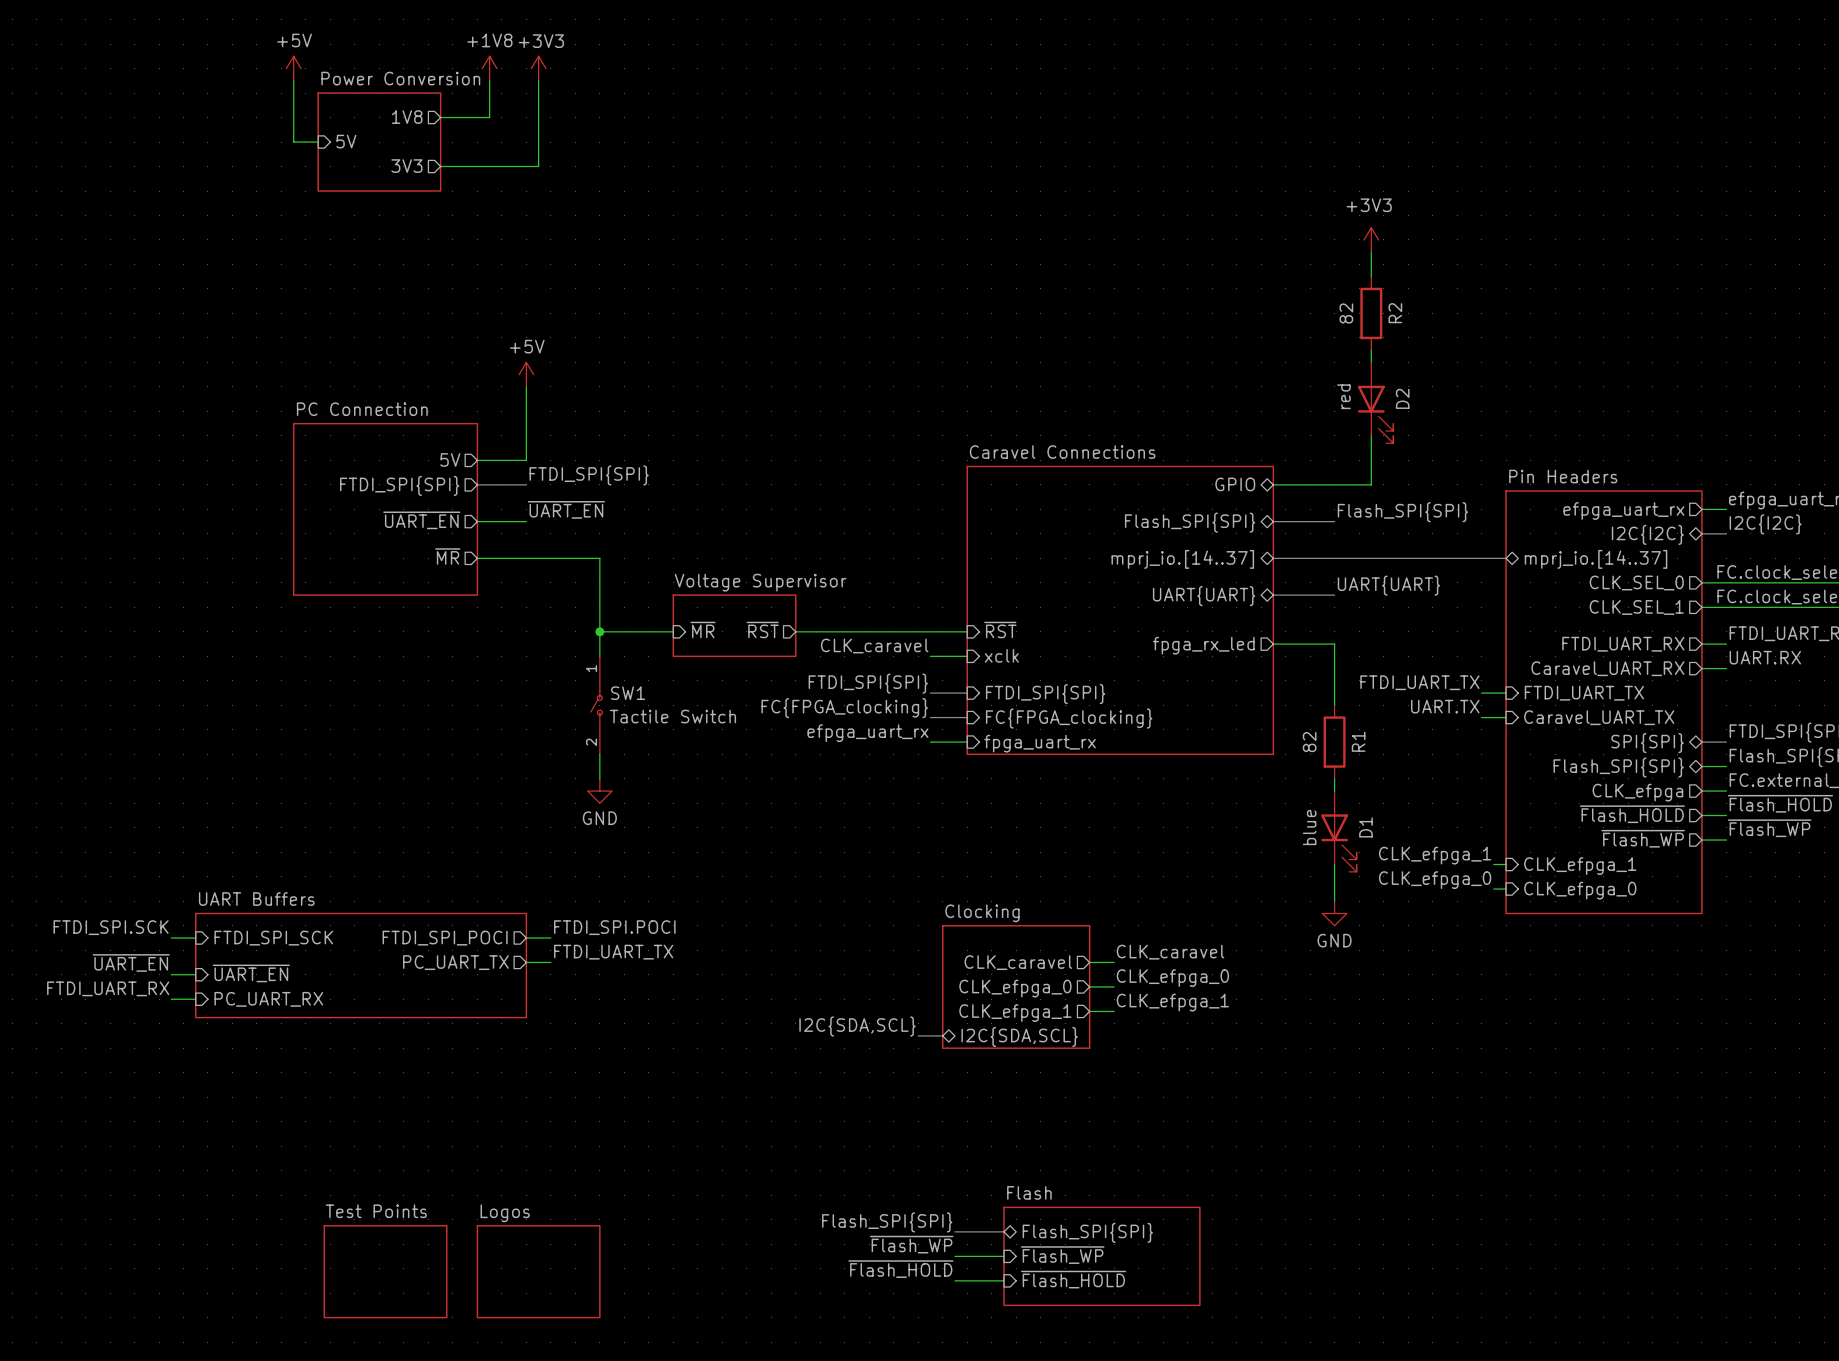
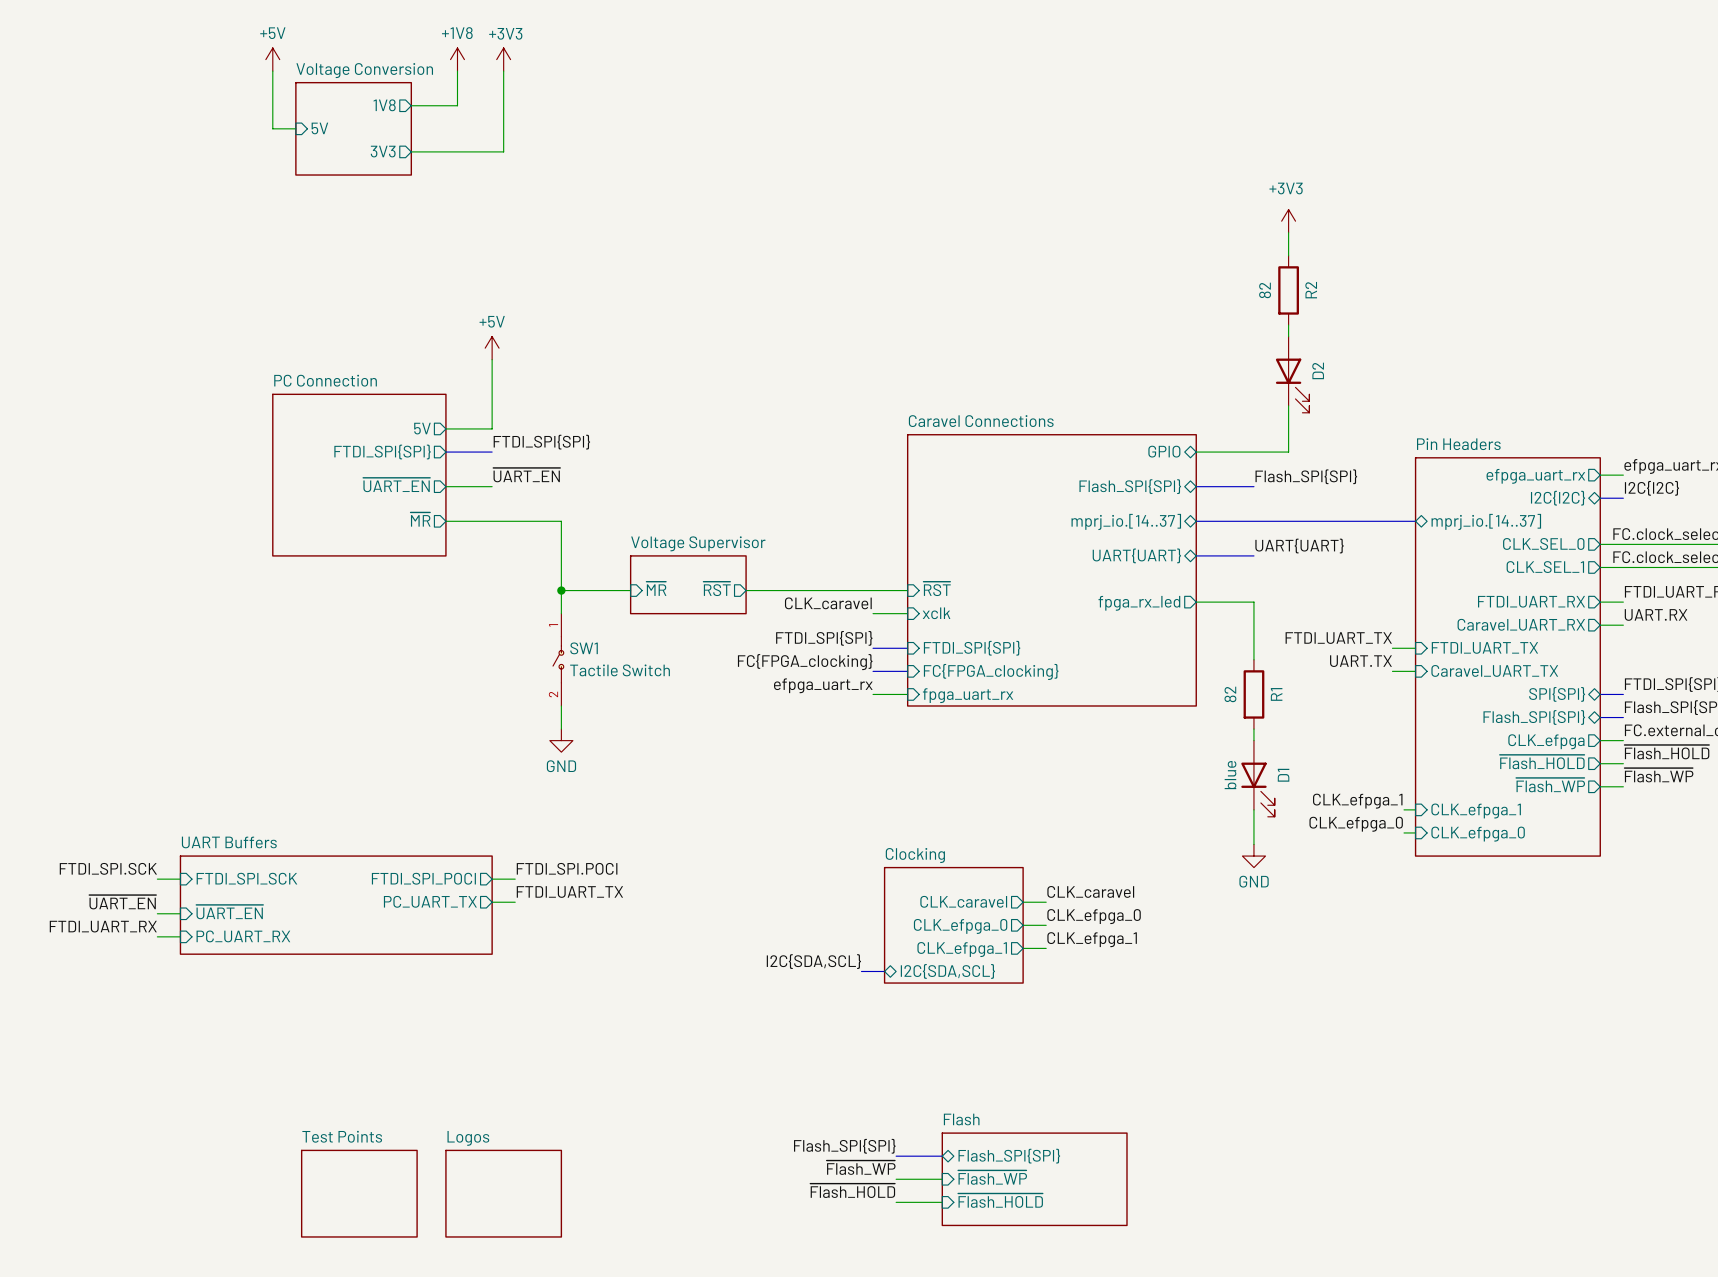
sheet Power Conversion name: Power Conversion (400, 78) -> Voltage Conversion (364, 70)
D2 text: red (1343, 396) -> none
bus: none -> (1600, 717) (1623, 717)

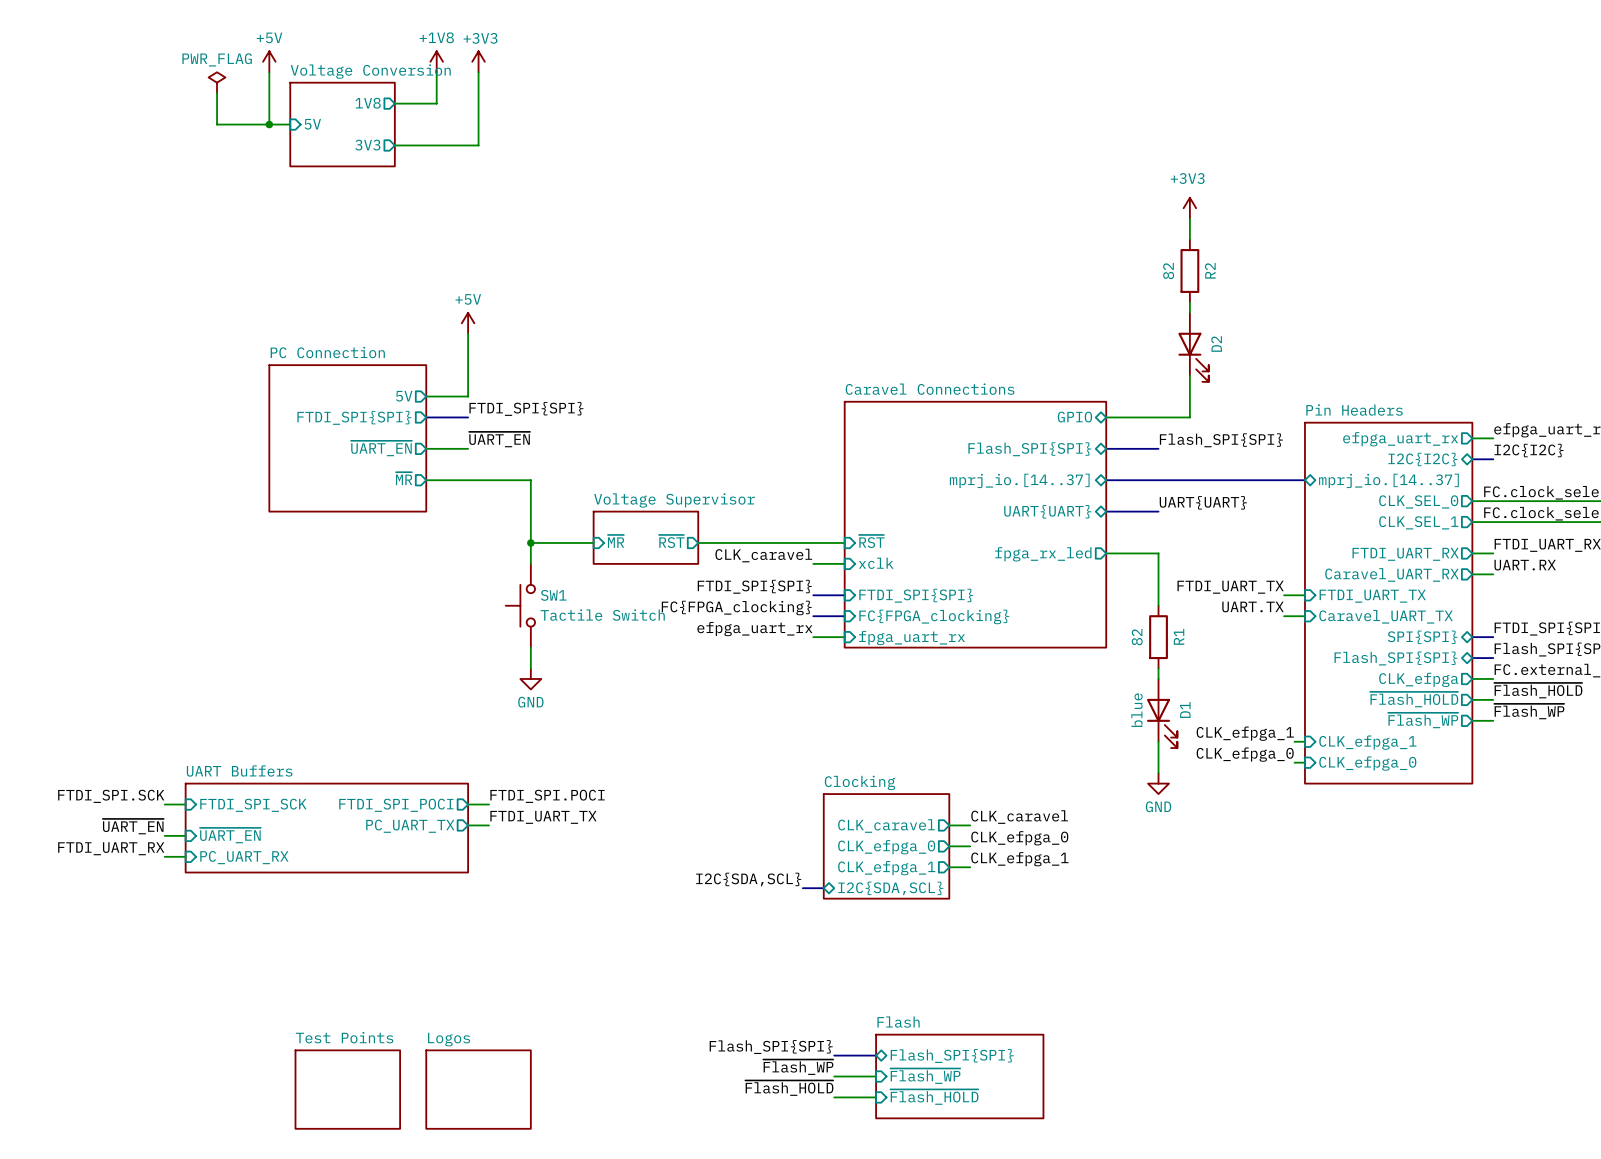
power symbol: none -> PWR_FLAG (217, 82)
wire: none -> (217, 93) (217, 124) (269, 124)
junction: none -> (269, 124)
SW1 symbol: [553, 613, 564, 706] -> [505, 563, 536, 648]

